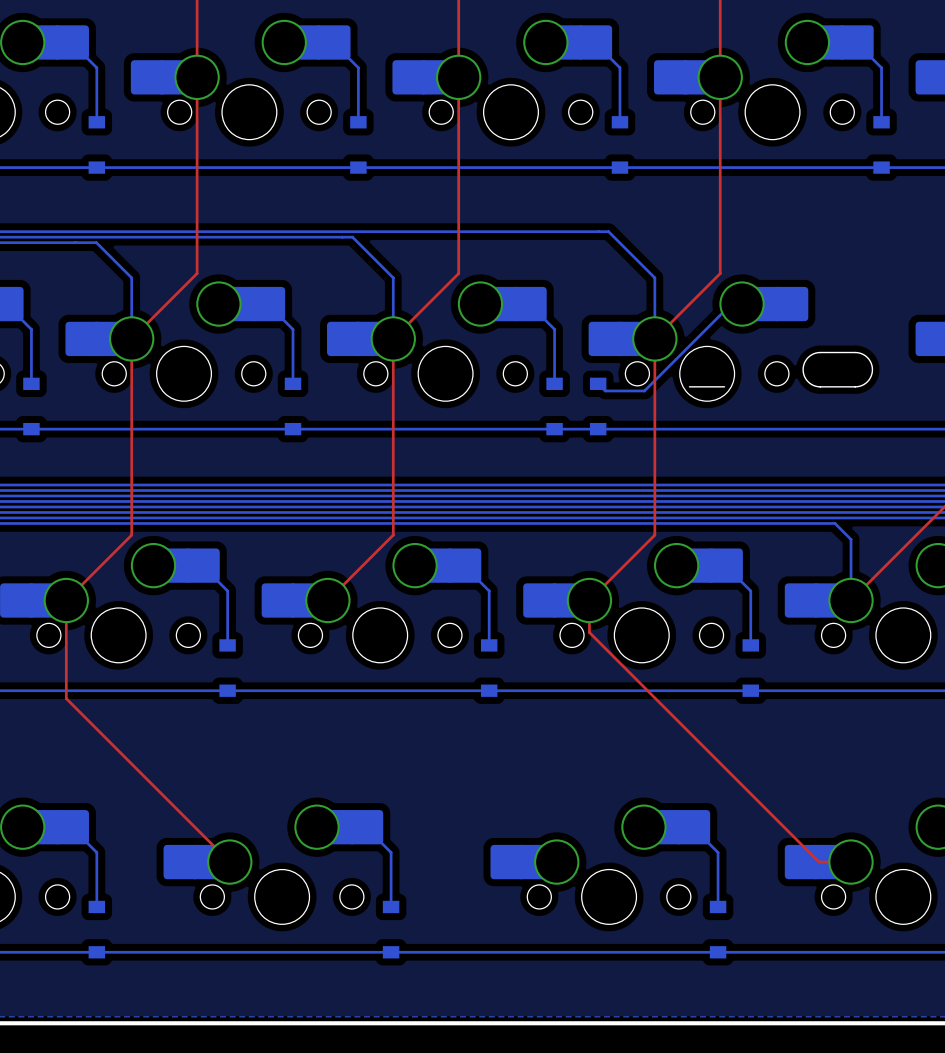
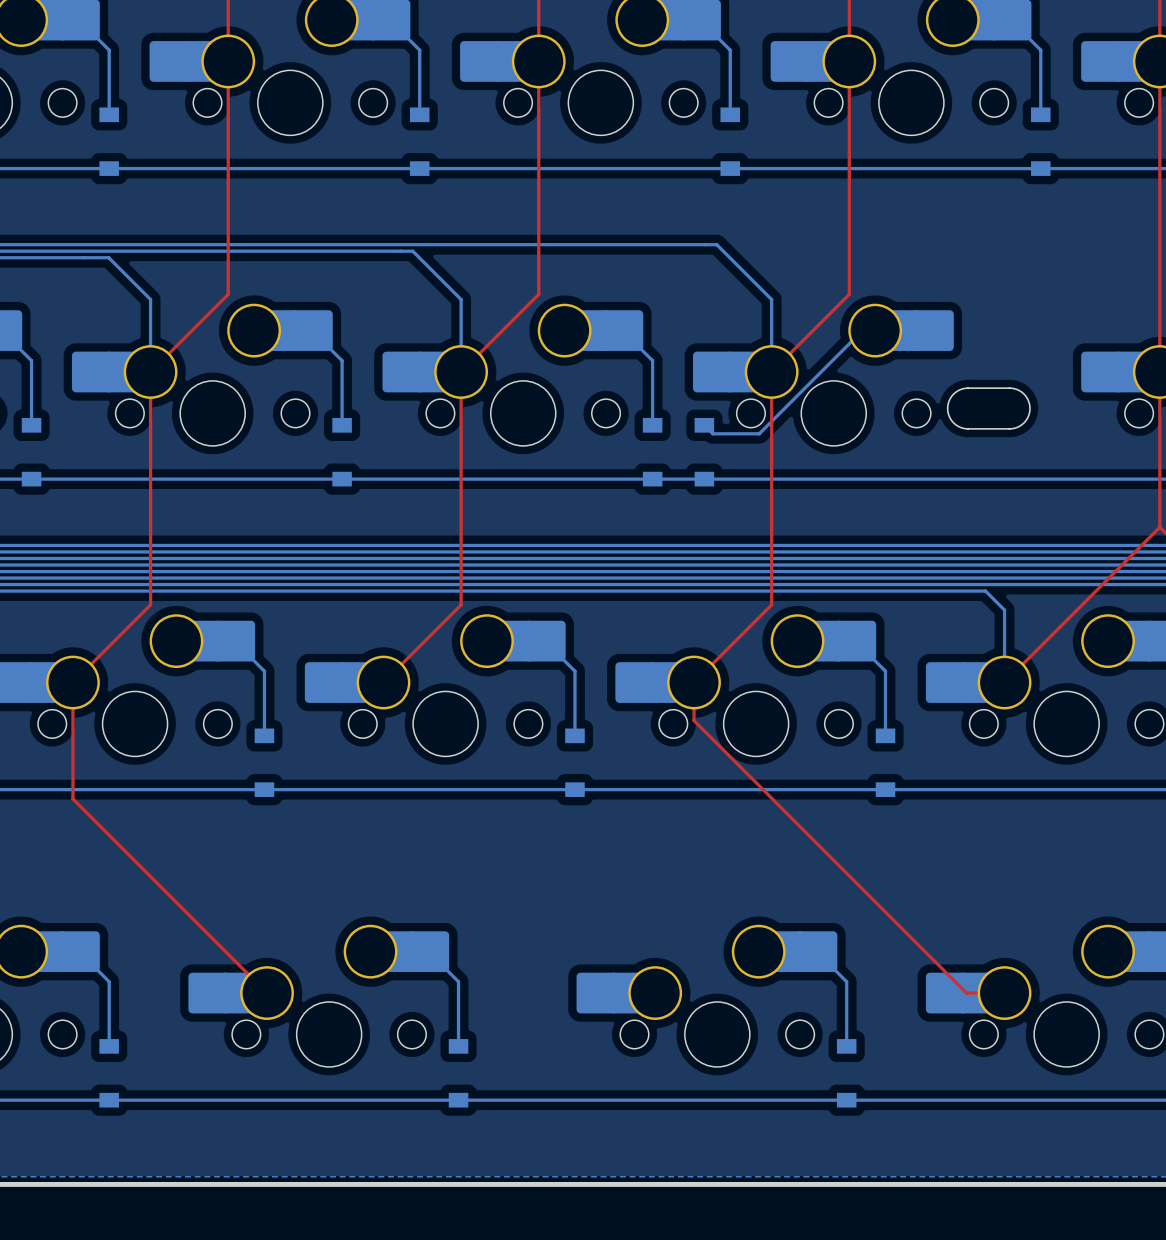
board edge: (689, 386) (724, 386) -> none

